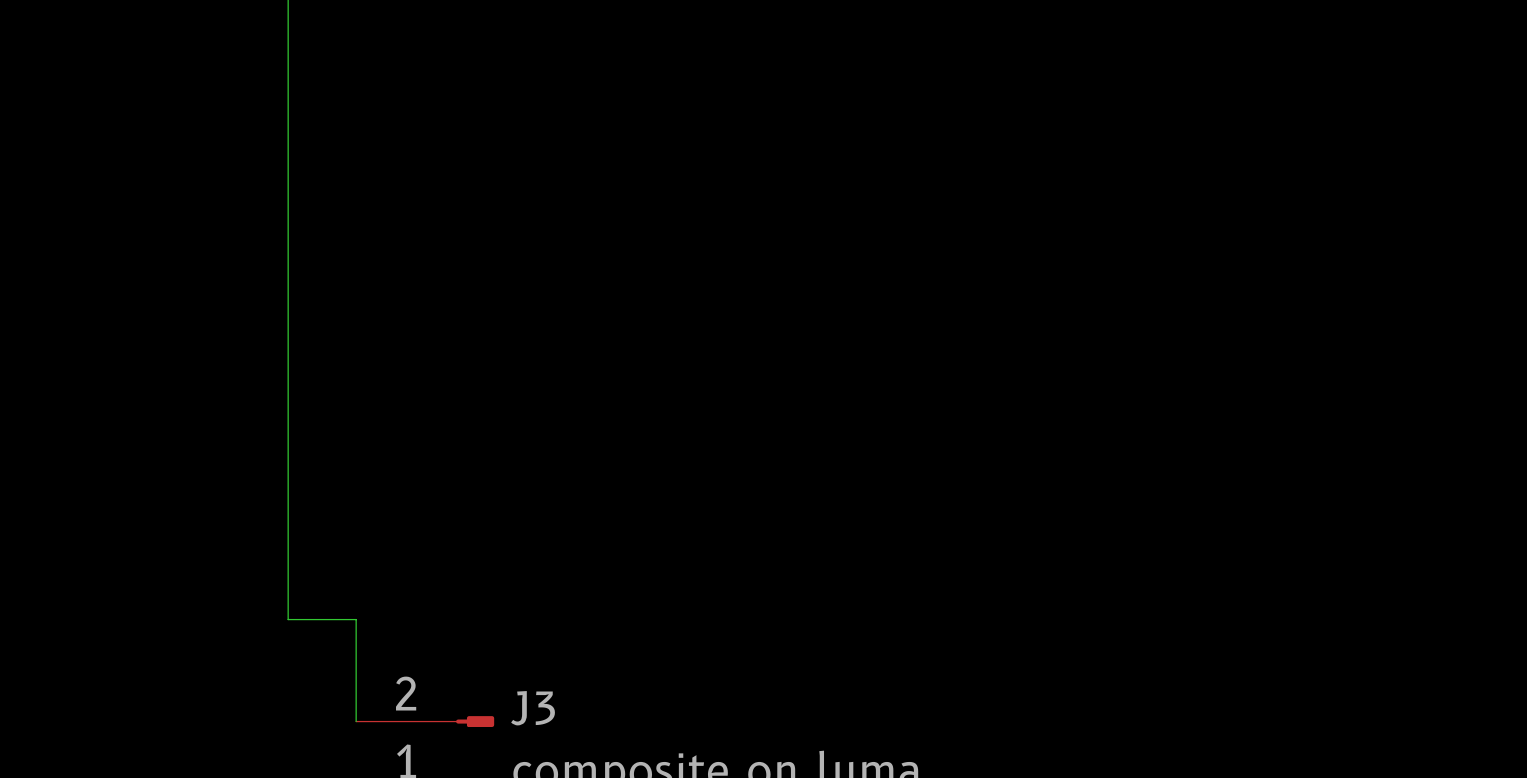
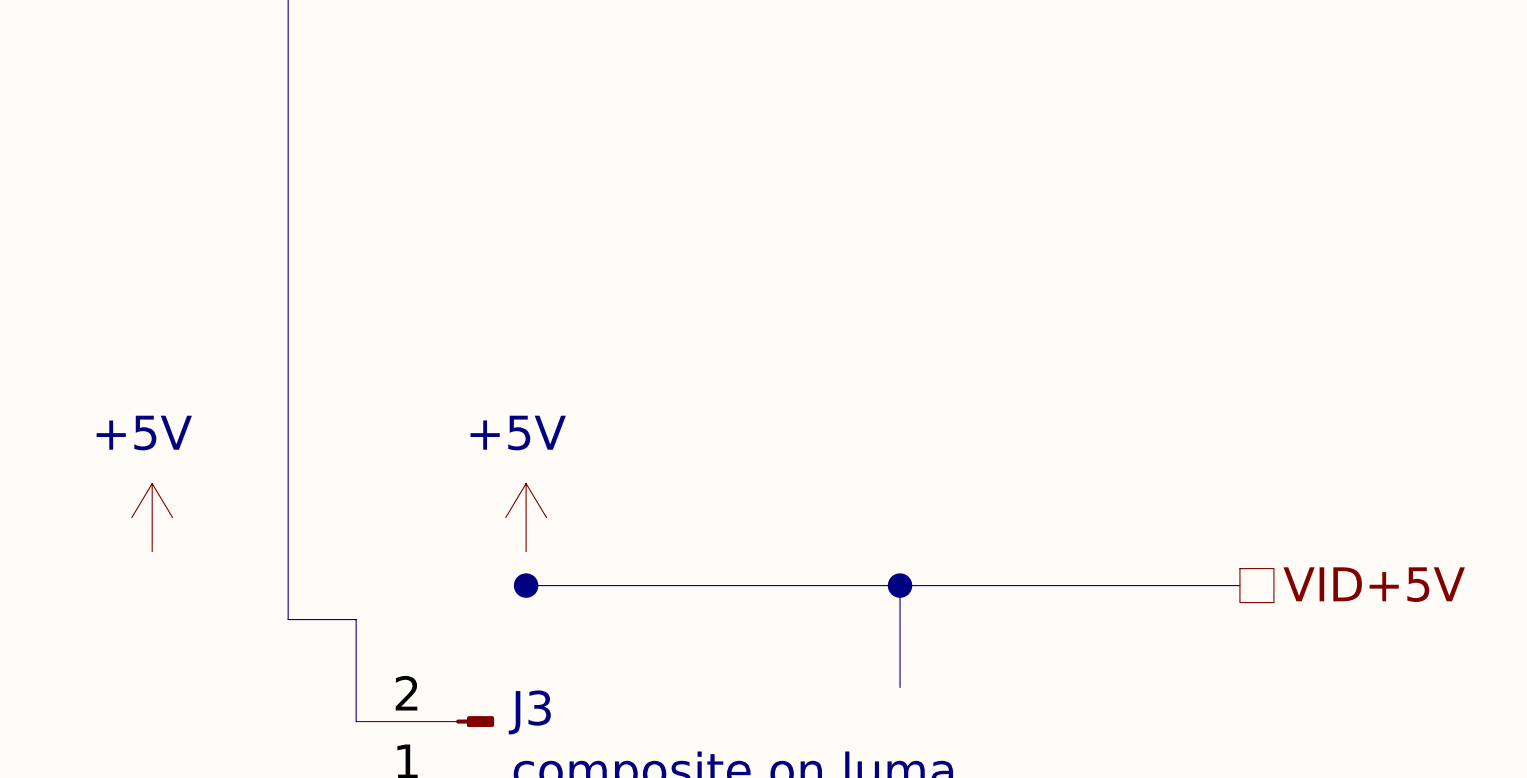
power symbol: none -> +5V (152, 517)
power symbol: none -> +5V (526, 517)
hierarchical label: none -> VID+5V (1374, 584)
wire: none -> (526, 585) (1239, 585)
junction: none -> (526, 585)
wire: none -> (900, 585) (900, 687)
junction: none -> (900, 585)

